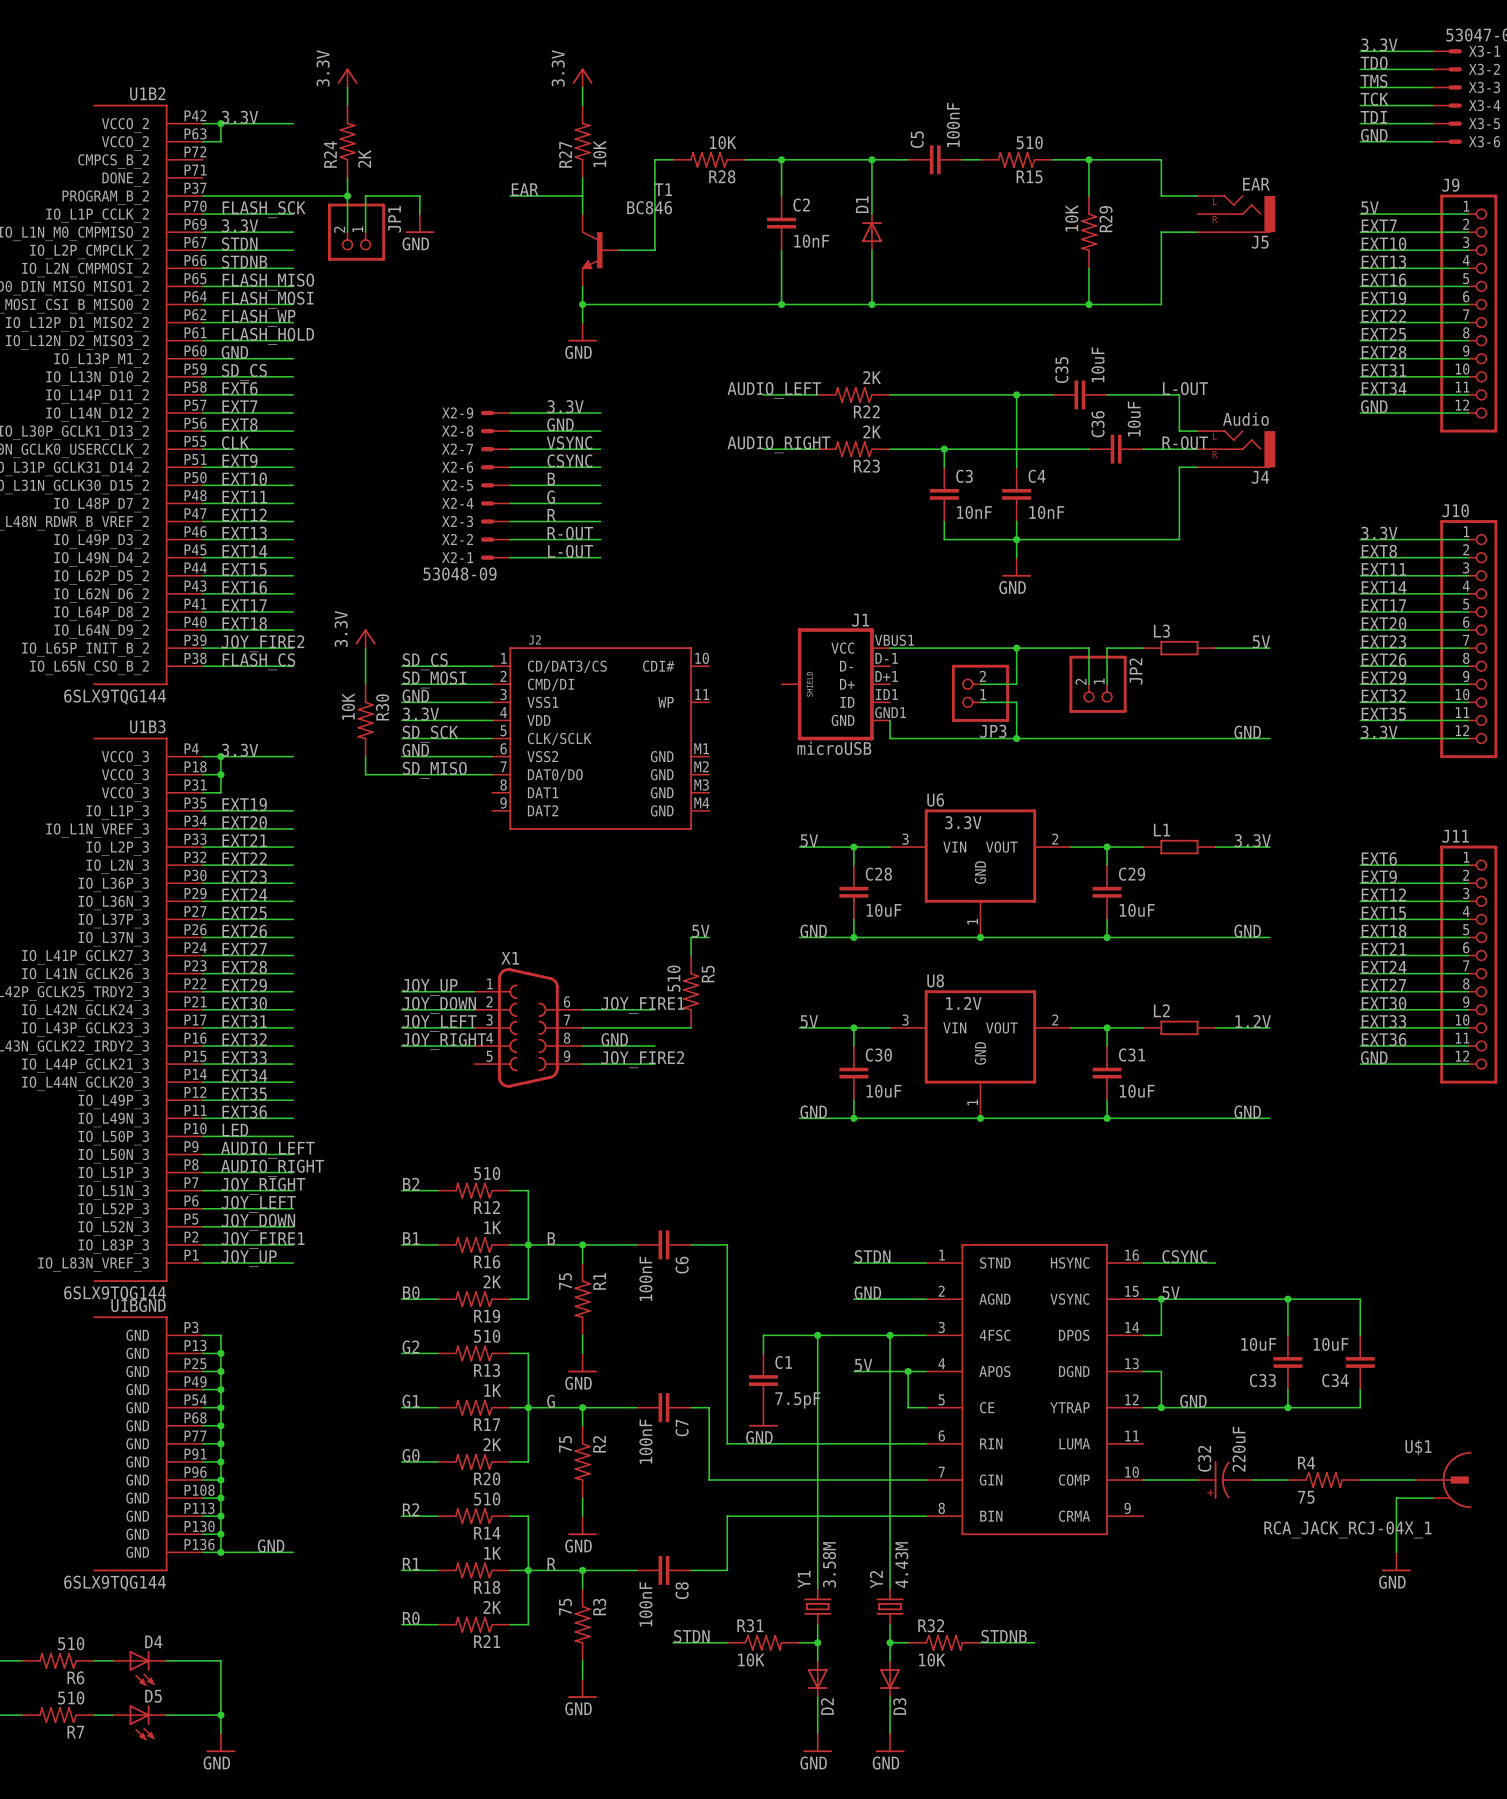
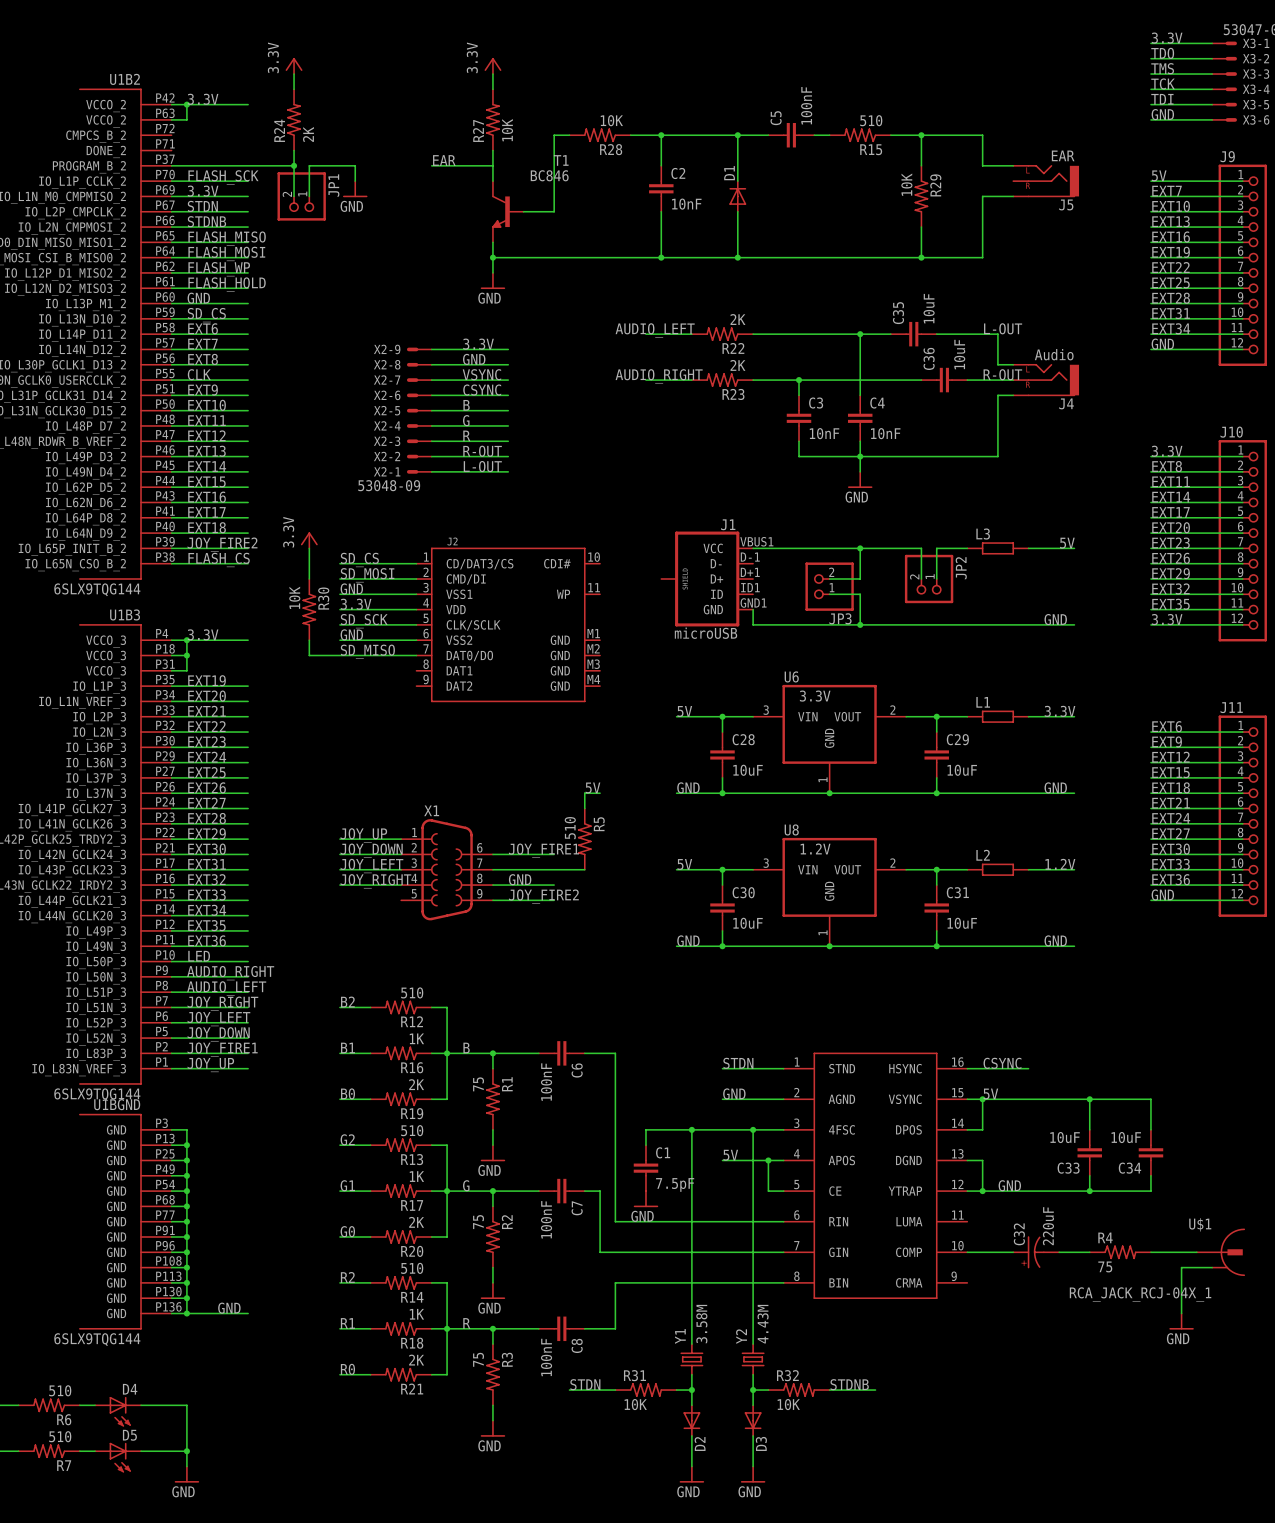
label: AUDIO_LEFT (267, 1150) -> AUDIO_RIGHT (230, 973)
label: AUDIO_RIGHT (272, 1168) -> AUDIO_LEFT (226, 988)

